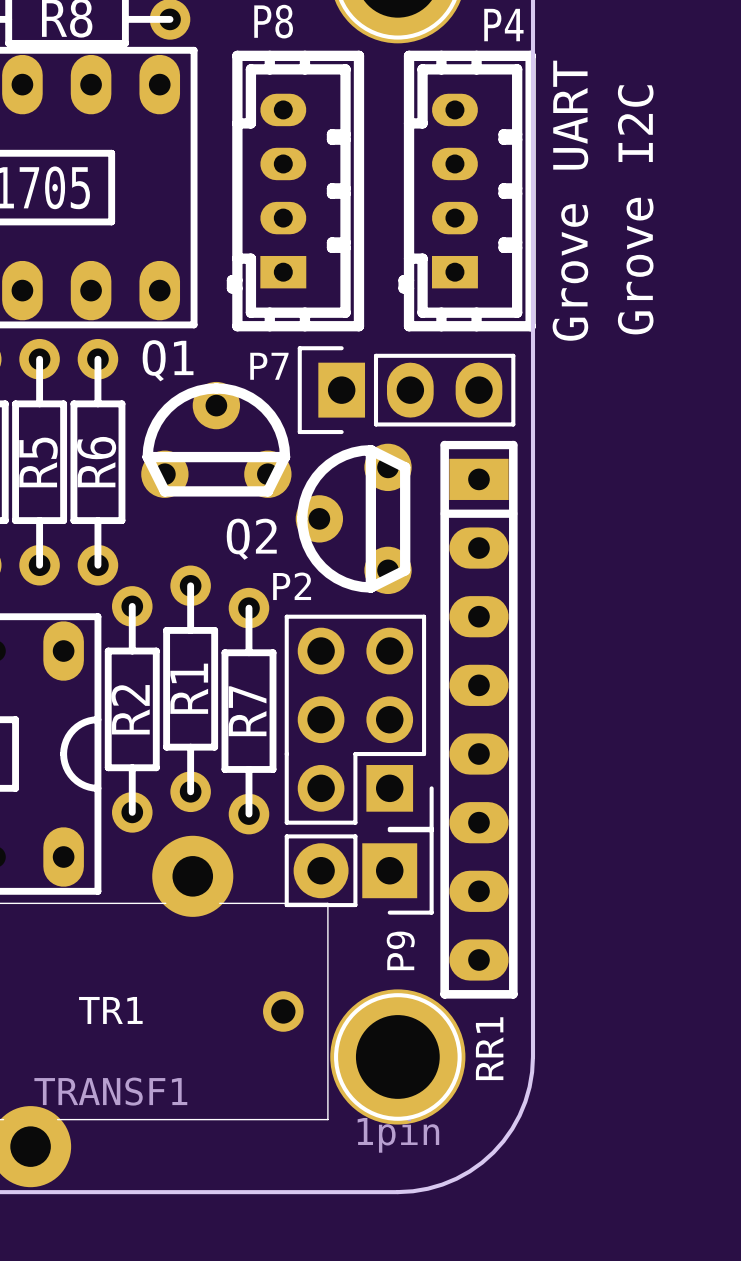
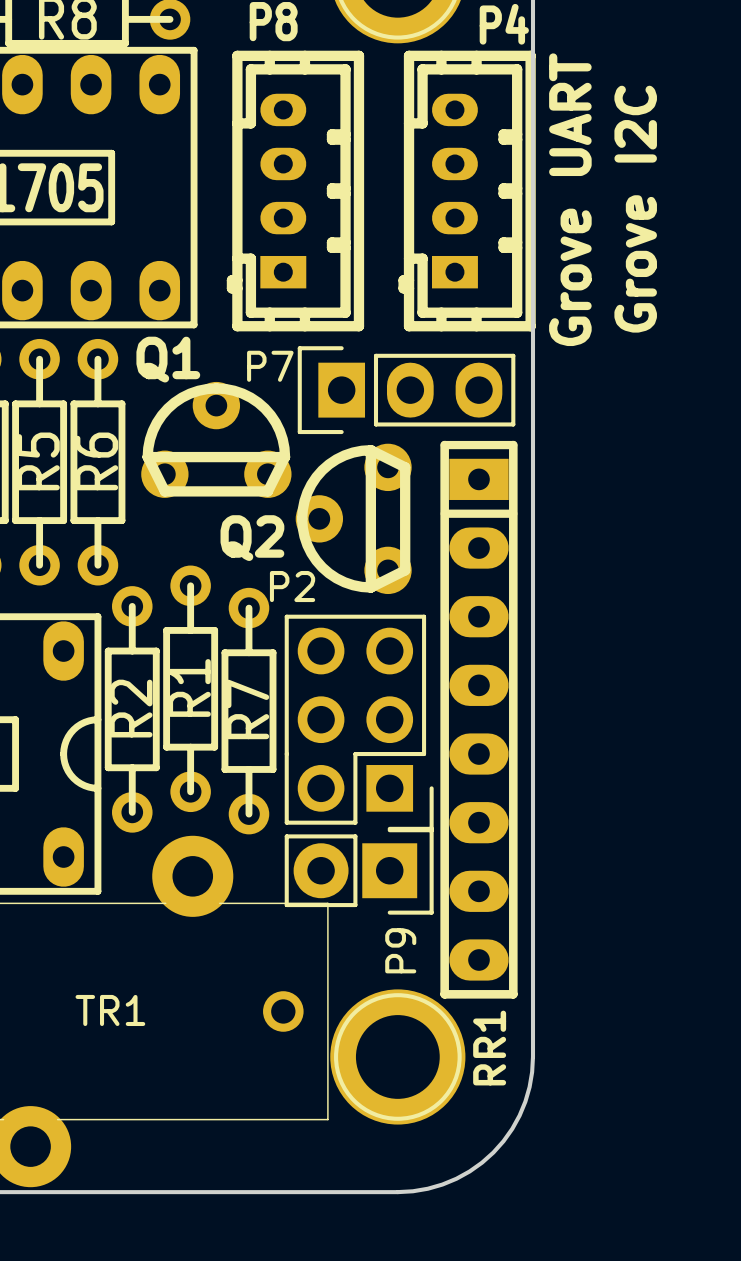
TR1 value: TRANSF1 (110, 1091) -> none
part value: 1pin (398, 1134) -> none

